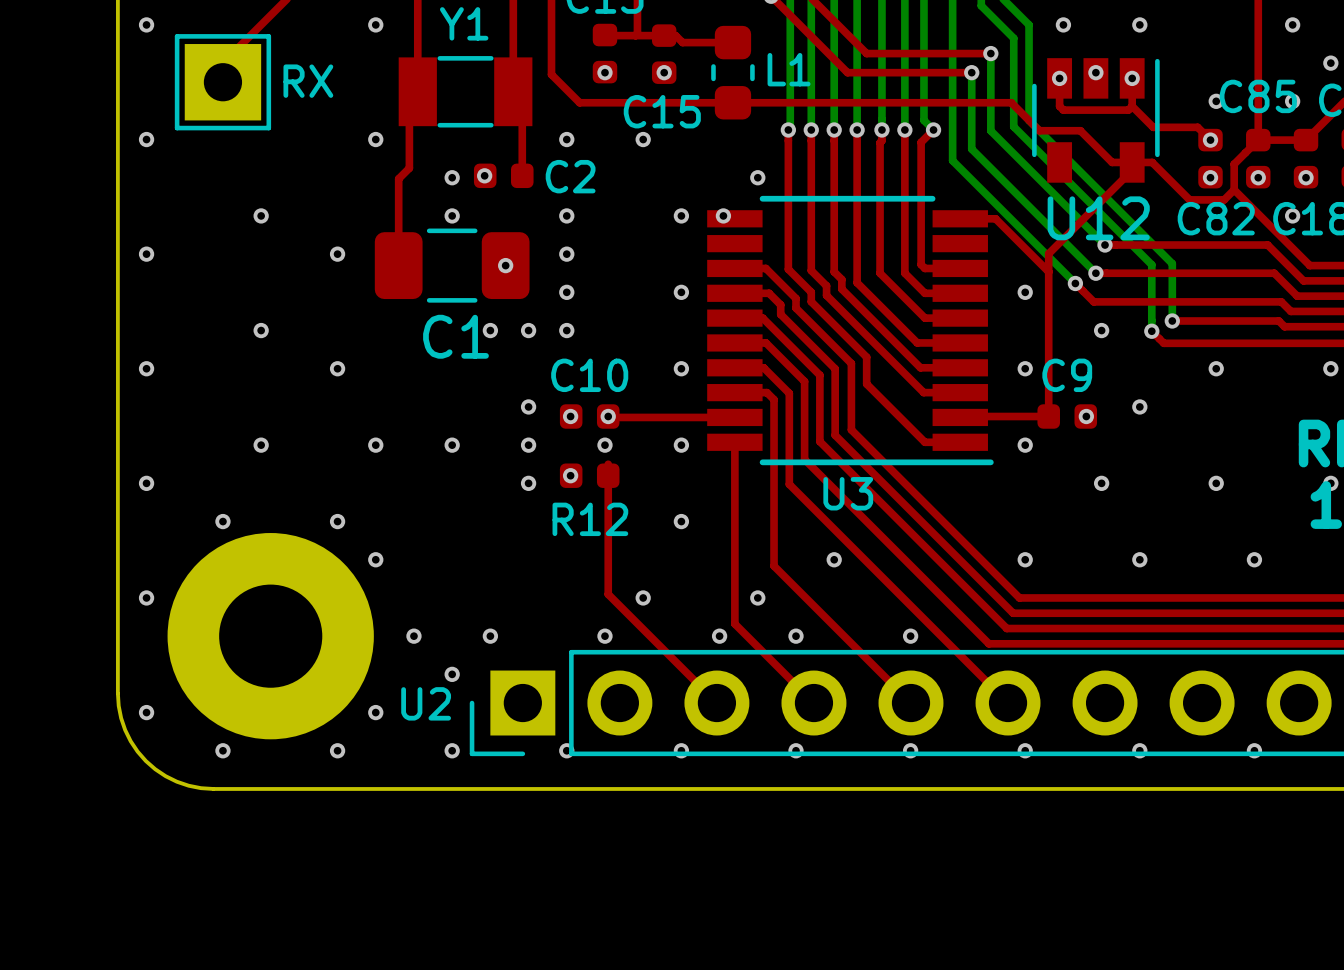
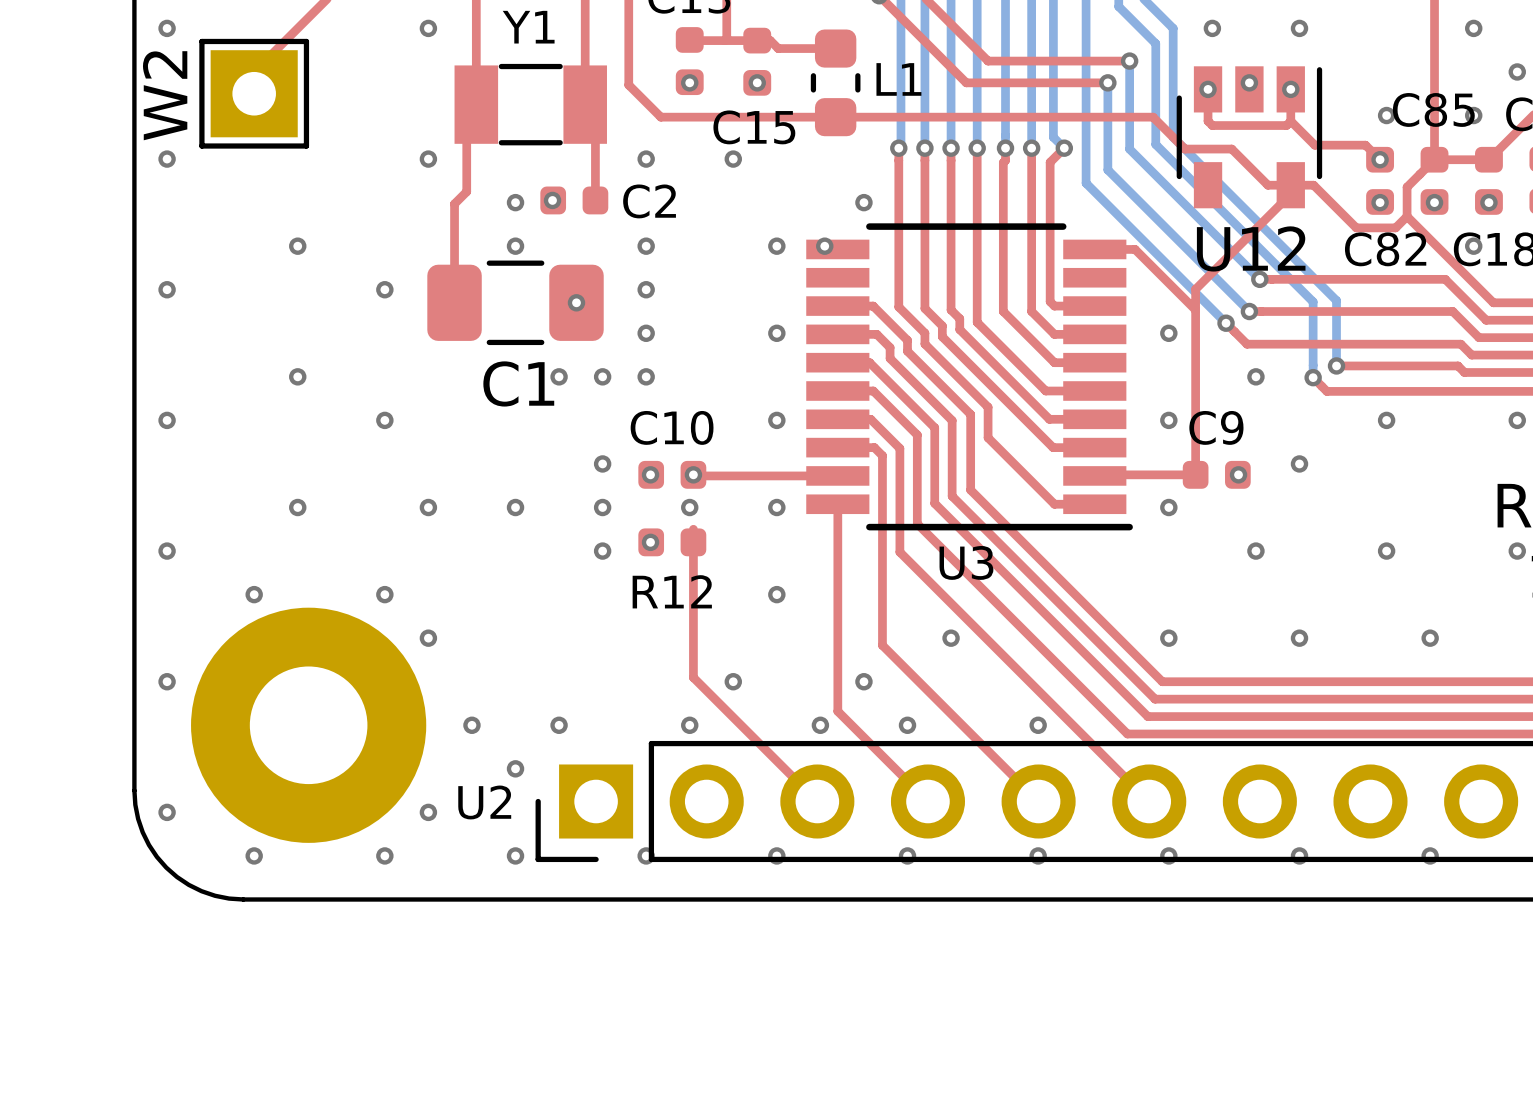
RX name: RX (308, 81) -> W2 (165, 95)

